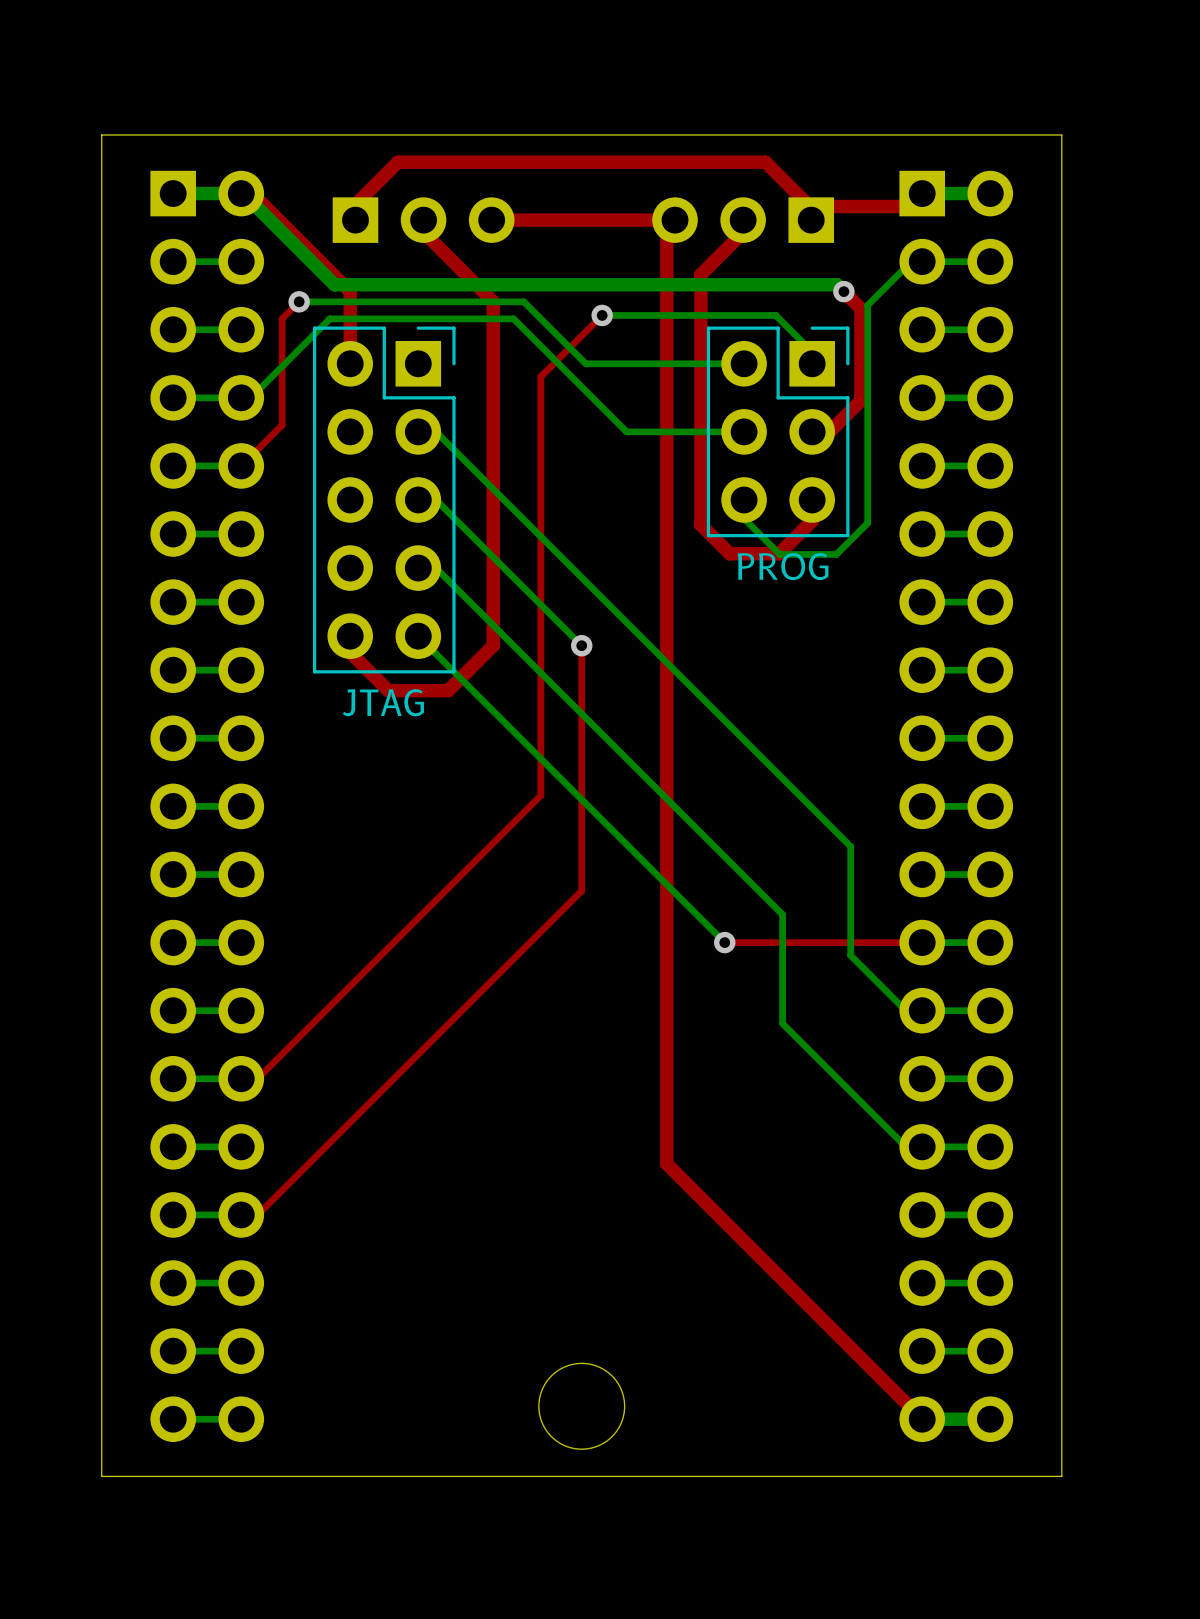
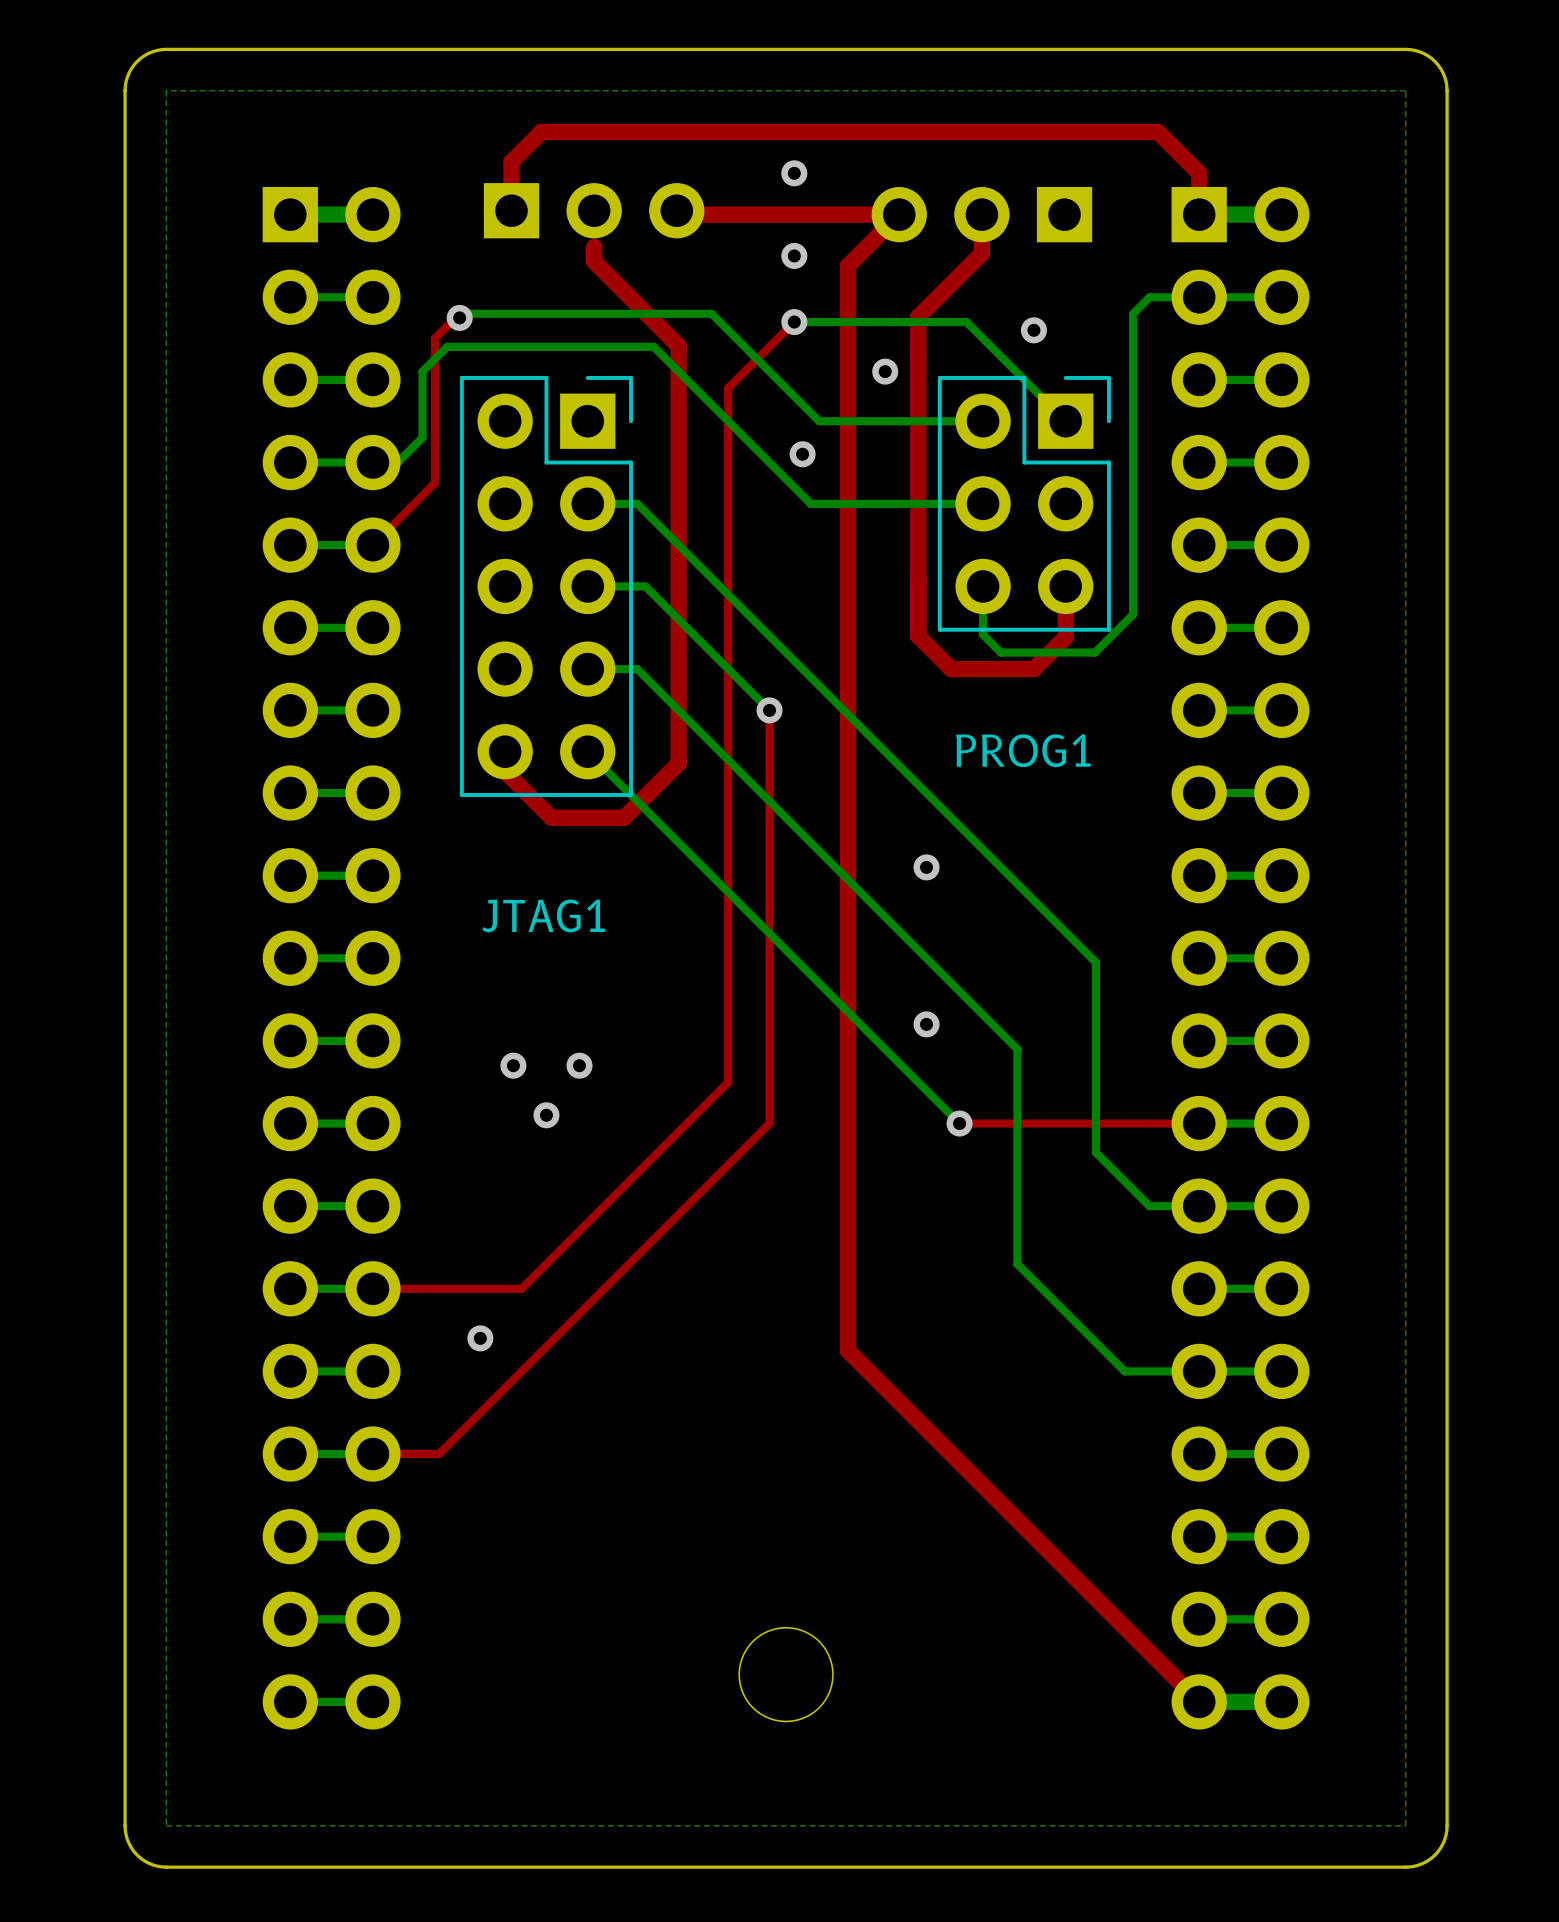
bottom zone outline: none -> (1405, 90) (1405, 1825) (166, 1825) (166, 90) (1405, 90)
board edge: (1061, 135) (101, 135) (101, 1476) (1061, 1476) (1061, 135) -> (1405, 49) (1419, 51) (1434, 61) (1444, 77) (1447, 90) (1447, 1825) (1446, 1835) (1440, 1847) (1427, 1860) (1414, 1866) (1405, 1867) (166, 1867) (157, 1866) (144, 1860) (131, 1847) (126, 1835) (125, 1825) (125, 90) (126, 81) (131, 68) (144, 55) (157, 50) (166, 49) (1405, 49)
via: none -> (794, 173)
top track: (241, 193) (252, 193) (350, 291) (350, 363) -> none
bottom track: (241, 193) (334, 284) (837, 284) (843, 291) -> none
top track: (922, 193) (909, 206) (824, 206) (811, 220) (811, 207) (765, 162) (397, 162) (355, 204) (355, 220) -> (1199, 214) (1199, 173) (1157, 132) (541, 132) (511, 161) (511, 210)
part position: (423, 220) -> (594, 210)
top track: (491, 220) (675, 220) (666, 228) (666, 1163) -> (676, 210) (680, 214) (899, 214) (848, 265) (848, 1350) (889, 1392)
part position: (743, 220) -> (981, 214)
top track: (743, 225) (743, 232) (700, 274) (700, 524) (729, 553) (779, 553) (812, 520) -> (981, 253) (918, 317) (918, 636) (951, 669) (1033, 669) (1065, 637) (1065, 611)
via: none -> (794, 255)
bottom track: (911, 261) (867, 305) -> (1185, 297) (1149, 297) (1133, 313) (1133, 350)
via: none -> (794, 322)
top track: (843, 291) (860, 308) (860, 400) (829, 431) (812, 431) -> none
via position: (843, 291) -> (1033, 330)
top track: (299, 301) (282, 318) (282, 425) -> (459, 317) (455, 317) (434, 338) (434, 483) (422, 495)
bottom track: (299, 301) (523, 301) (585, 363) (608, 363) -> (459, 317) (463, 313) (711, 313) (819, 421)
via position: (299, 301) -> (459, 317)
top track: (602, 315) (540, 376) (540, 795) (257, 1078) -> (794, 322) (728, 388) (728, 1082) (521, 1288) (392, 1288)
bottom track: (602, 315) (775, 315) (812, 351) (812, 363) -> (794, 322) (966, 322) (1065, 421)
via: (602, 315) -> none
via: none -> (885, 371)
via: none -> (802, 454)
bottom track: (250, 397) (329, 318) (513, 318) (626, 431) -> (384, 462) (397, 462) (422, 437) (422, 371) (447, 346) (653, 346) (810, 503) (840, 503)
bottom track: (436, 431) (850, 846) (850, 955) (905, 1010) -> (609, 503) (637, 503) (1095, 962) (1095, 1152) (1149, 1206) (1179, 1206)
bottom track: (436, 499) (581, 645) -> (609, 586) (645, 586) (769, 710)
bottom track: (744, 518) (779, 554) -> (983, 609) (983, 634) (1000, 652) (1026, 652)
text: PROG (783, 566) -> none
bottom track: (436, 568) (782, 914) (782, 1023) (905, 1146) -> (609, 669) (637, 669) (1017, 1049) (1017, 1264) (1124, 1371) (1179, 1371)
PROG1 name: none -> PROG1 (1023, 750)
top track: (581, 645) (581, 890) (257, 1214) -> (769, 710) (769, 1123) (439, 1454) (392, 1454)
via position: (581, 645) -> (769, 710)
text: JTAG (383, 702) -> none
via: none -> (926, 867)
JTAG1 name: none -> JTAG1 (543, 915)
via: none -> (926, 1024)
via: none -> (513, 1065)
via: none -> (579, 1065)
via: none -> (546, 1115)
via: none -> (480, 1338)
round board edge size: [538, 1362, 626, 1450] -> [738, 1626, 834, 1723]

